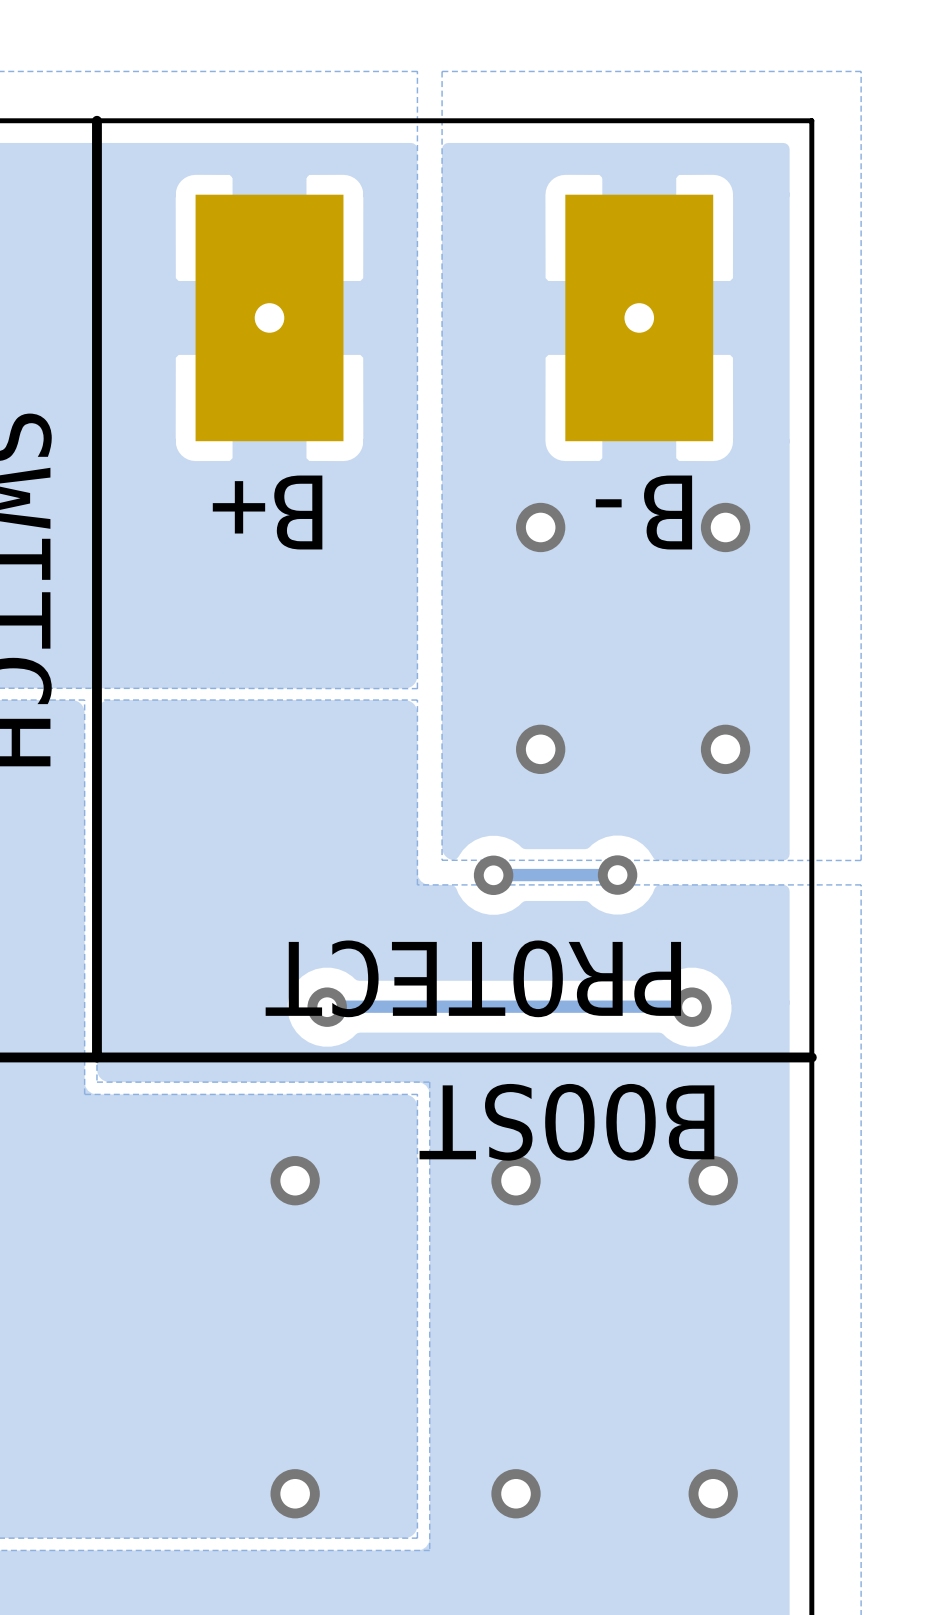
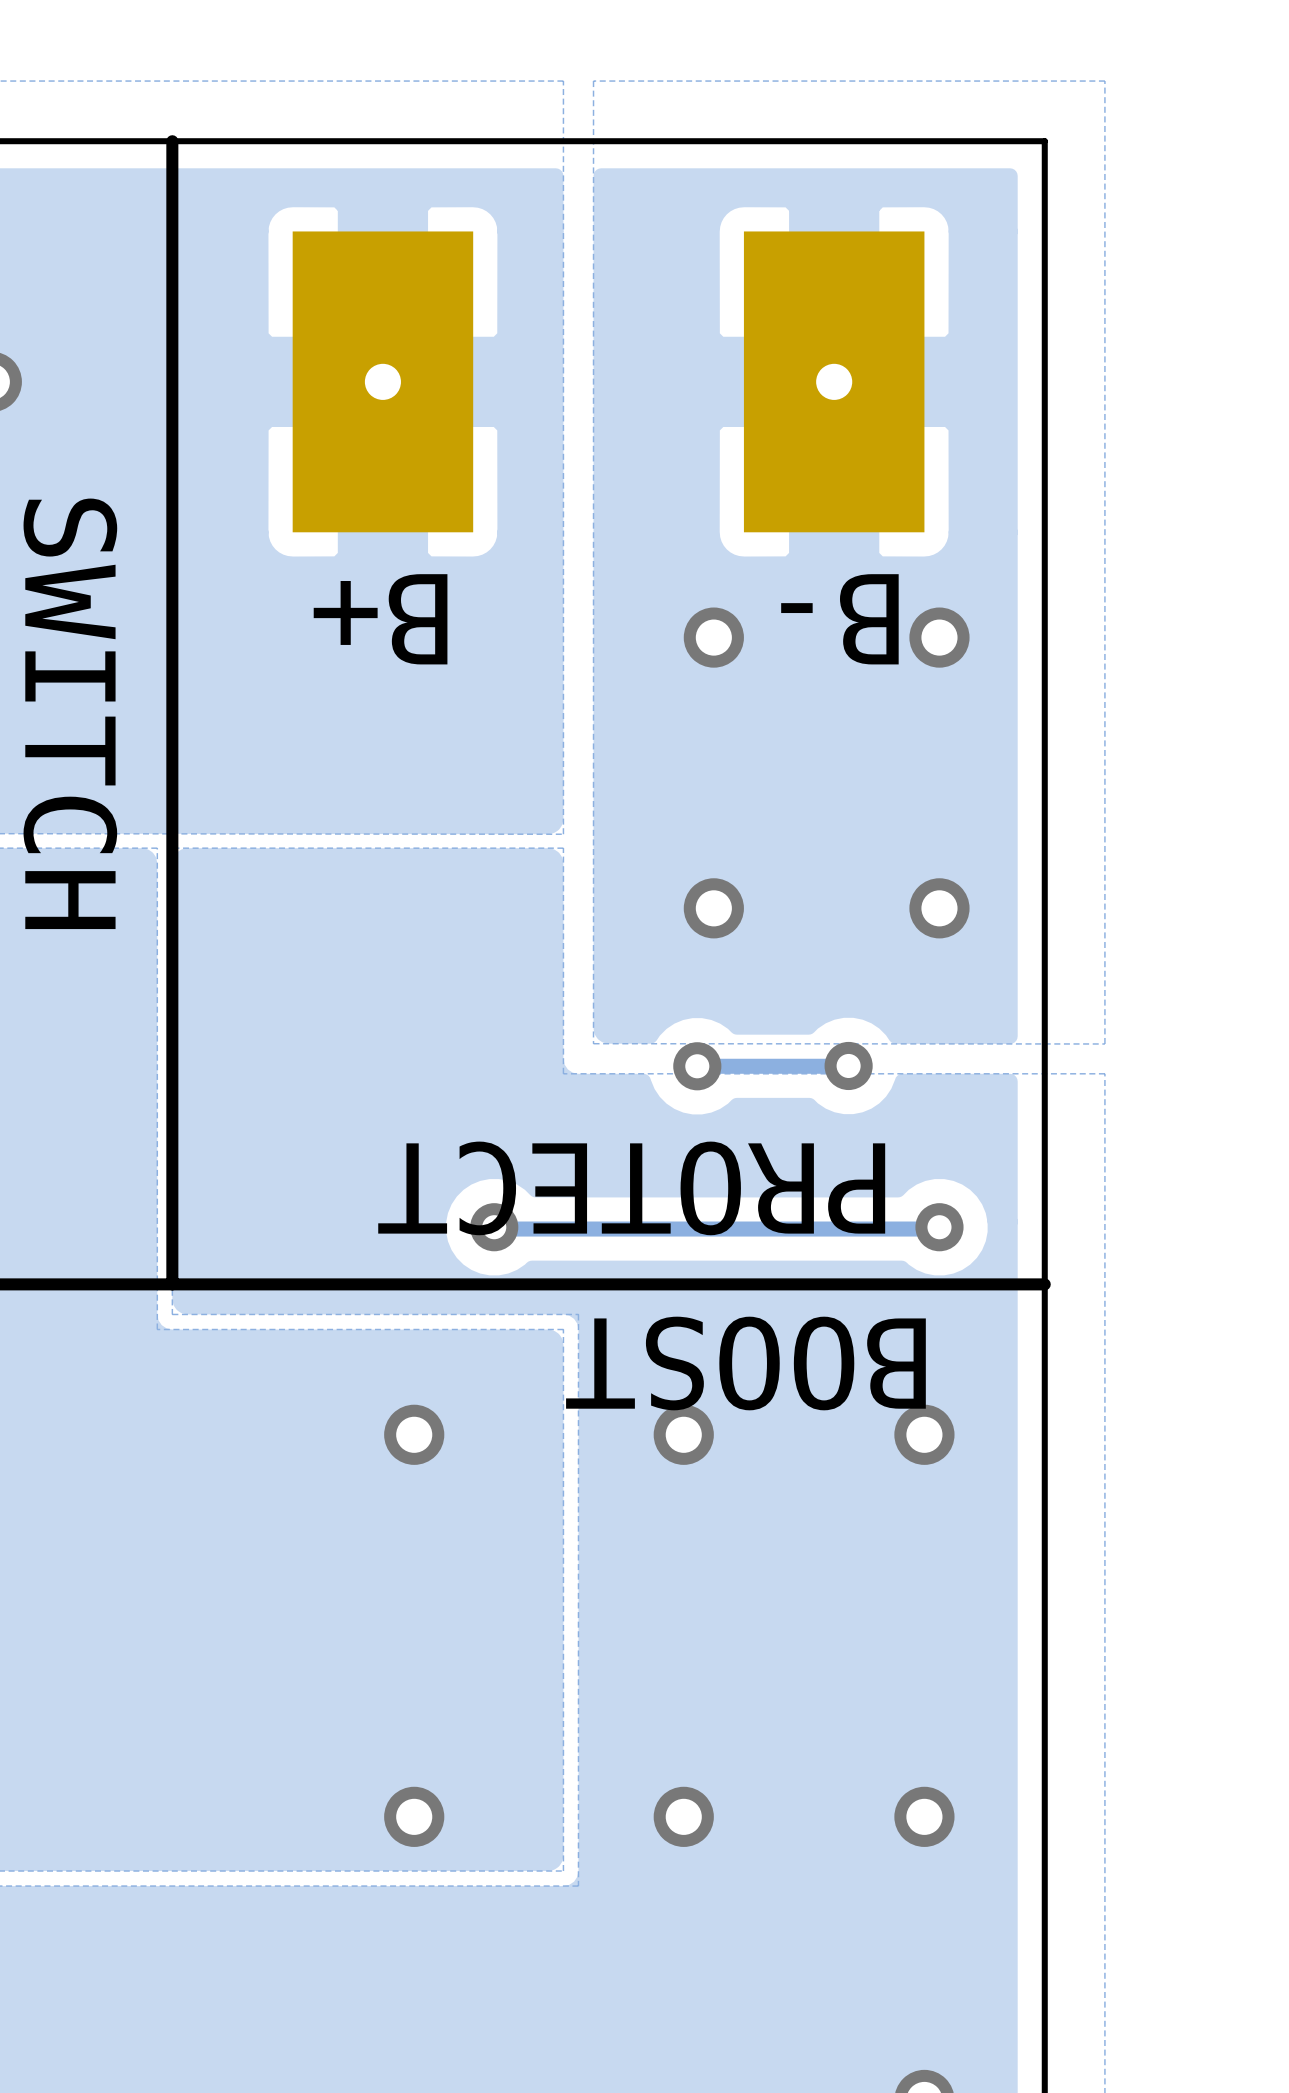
via position: (493, 875) -> (697, 1066)
track: (617, 875) (493, 875) -> (848, 1066) (697, 1066)
via position: (617, 875) -> (848, 1065)
track: (692, 1006) (330, 1006) -> none
via position: (327, 1007) -> (494, 1227)
via position: (692, 1007) -> (939, 1227)
track: none -> (939, 1227) (937, 1229) (496, 1229) (494, 1227)

